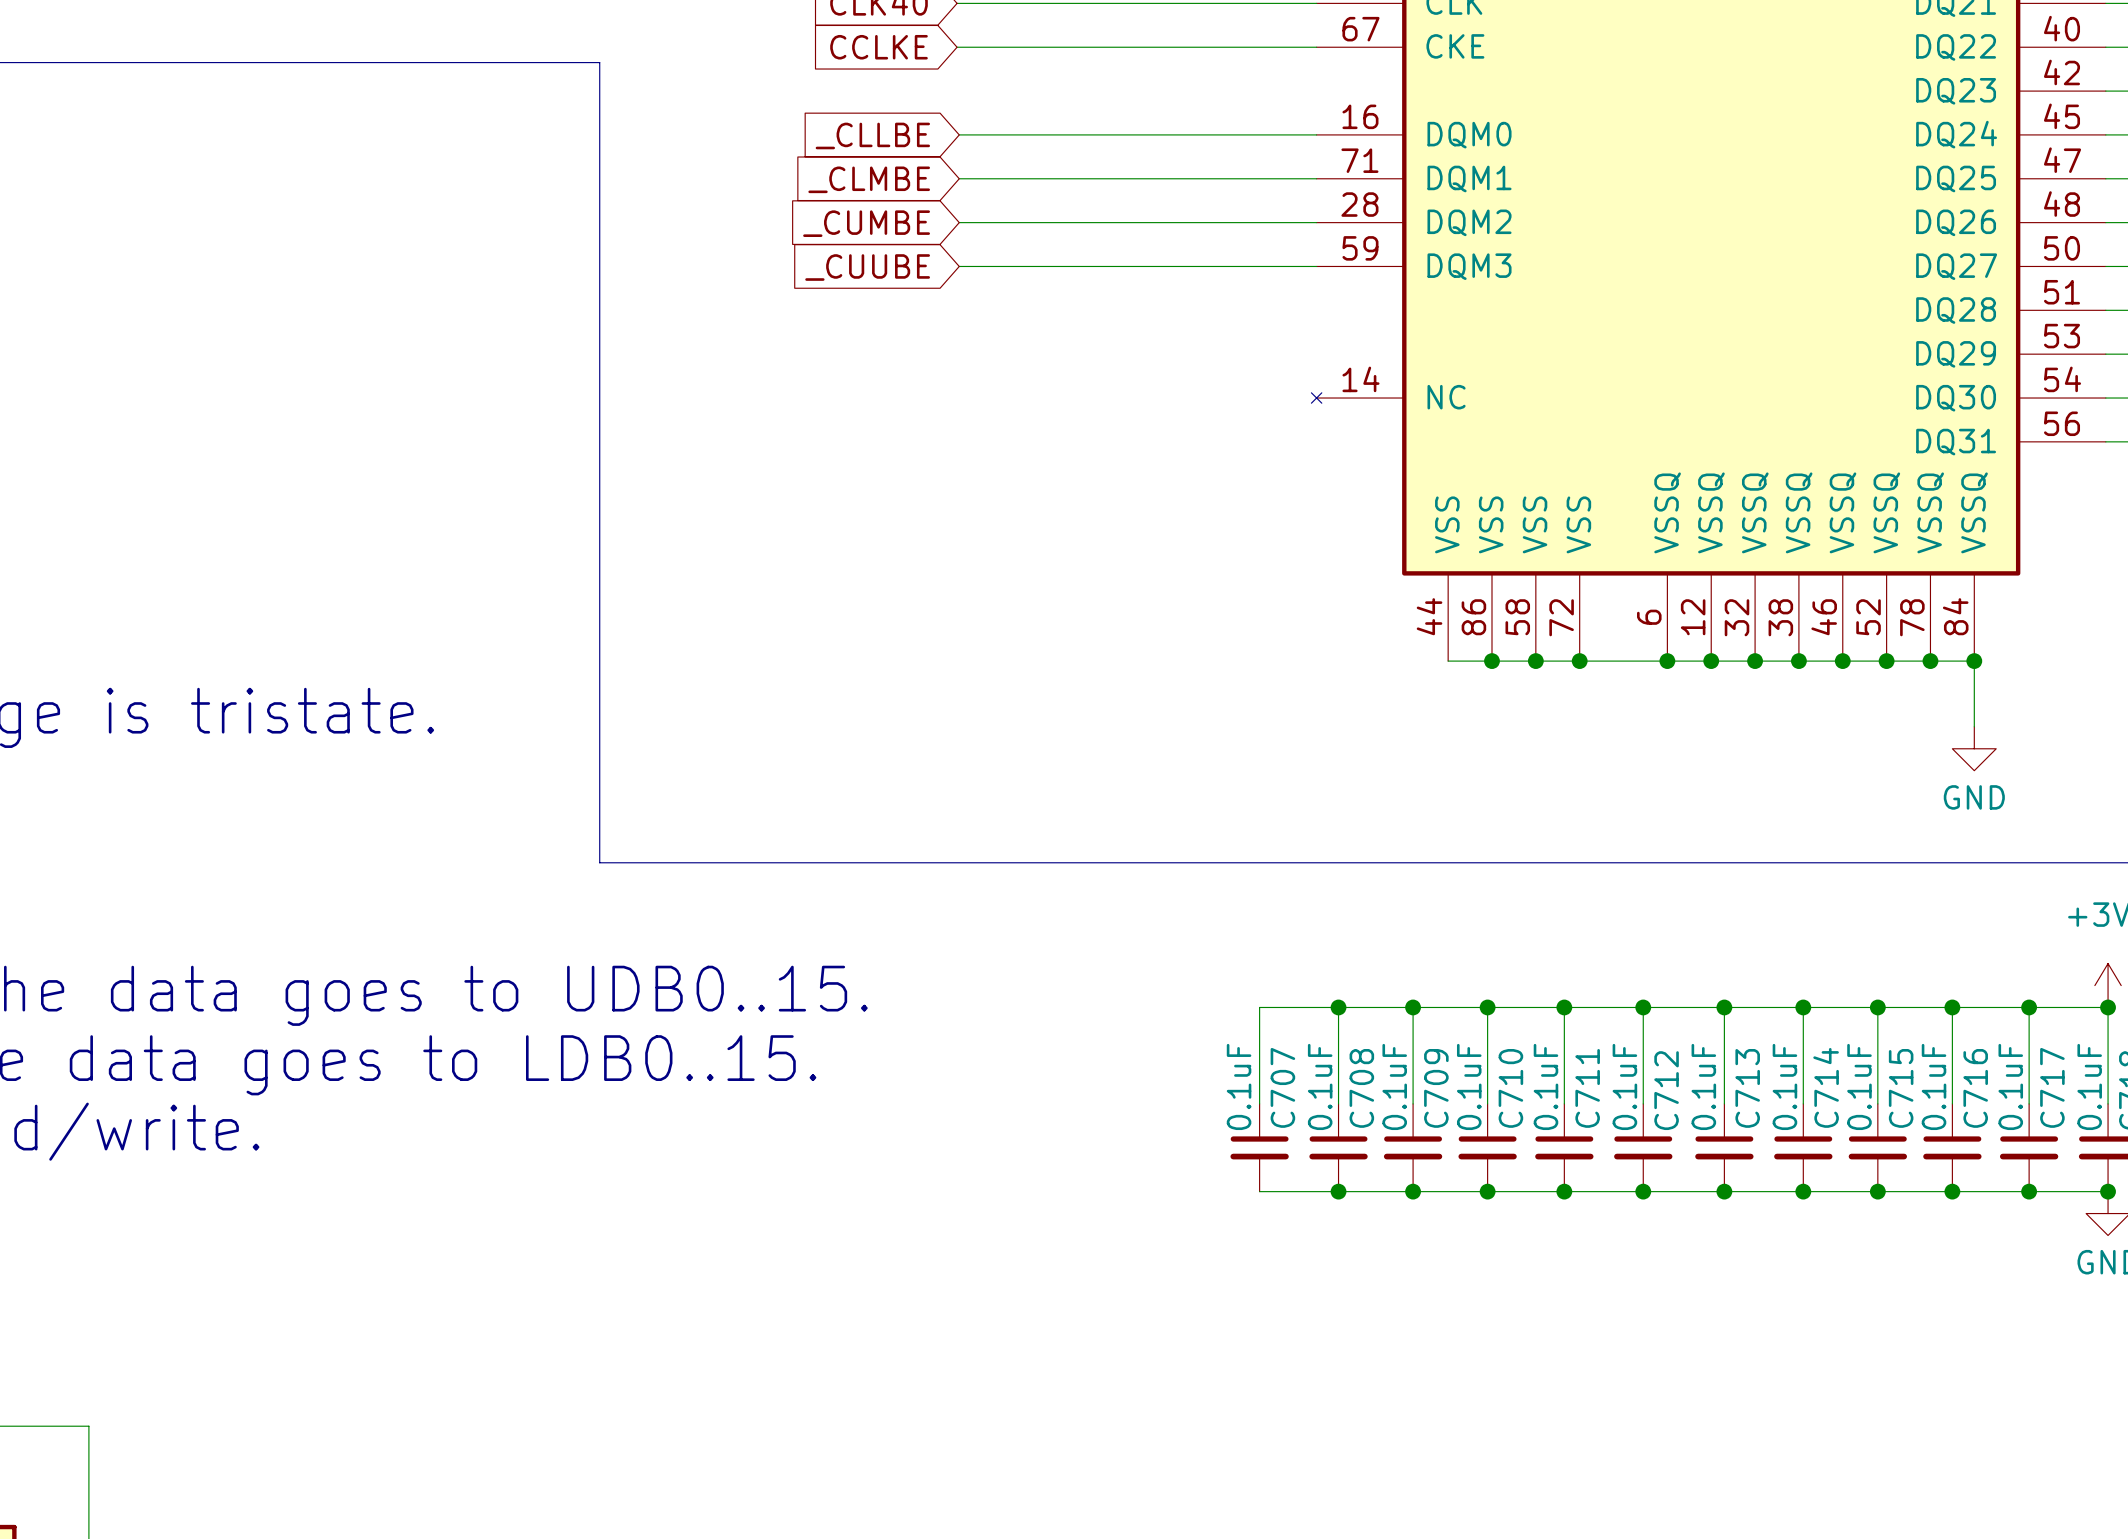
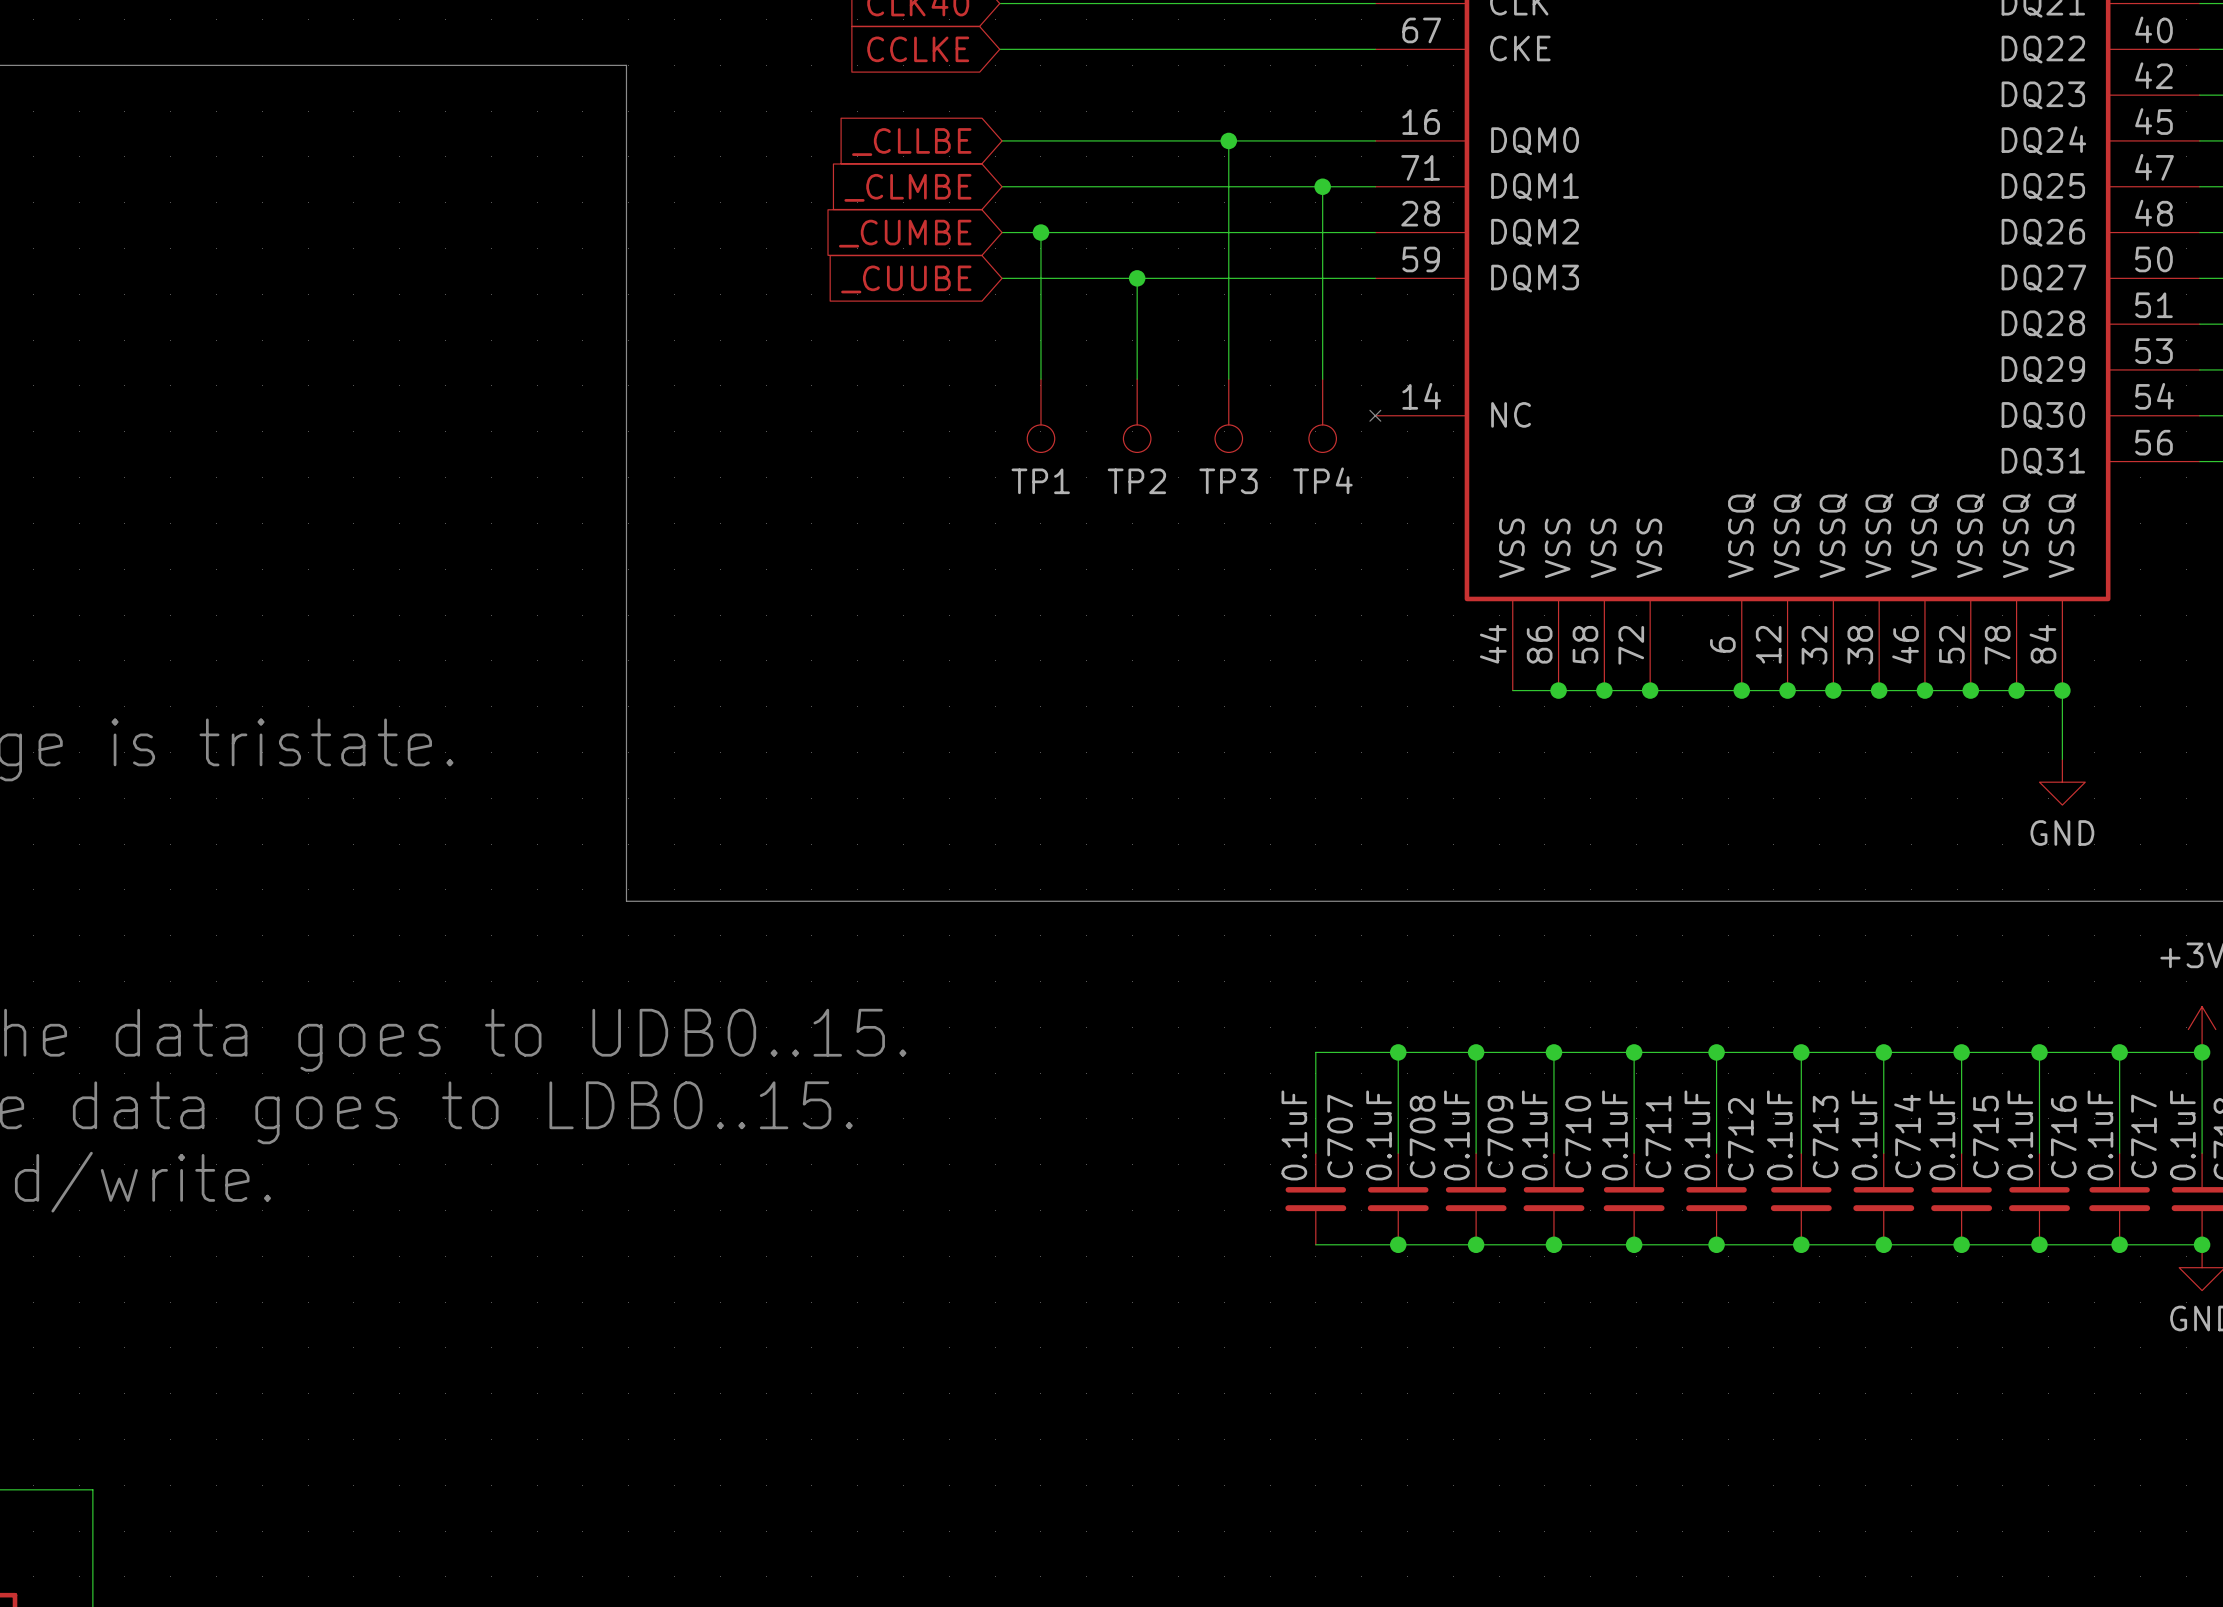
wire: none -> (1228, 140) (1228, 379)
junction: none -> (1228, 140)
wire: none -> (1322, 186) (1322, 379)
junction: none -> (1322, 186)
wire: none -> (1040, 232) (1040, 379)
junction: none -> (1040, 232)
wire: none -> (1137, 278) (1137, 379)
junction: none -> (1137, 278)
TP1: none -> (1040, 415)
TP2: none -> (1137, 415)
TP3: none -> (1228, 415)
TP4: none -> (1322, 415)

